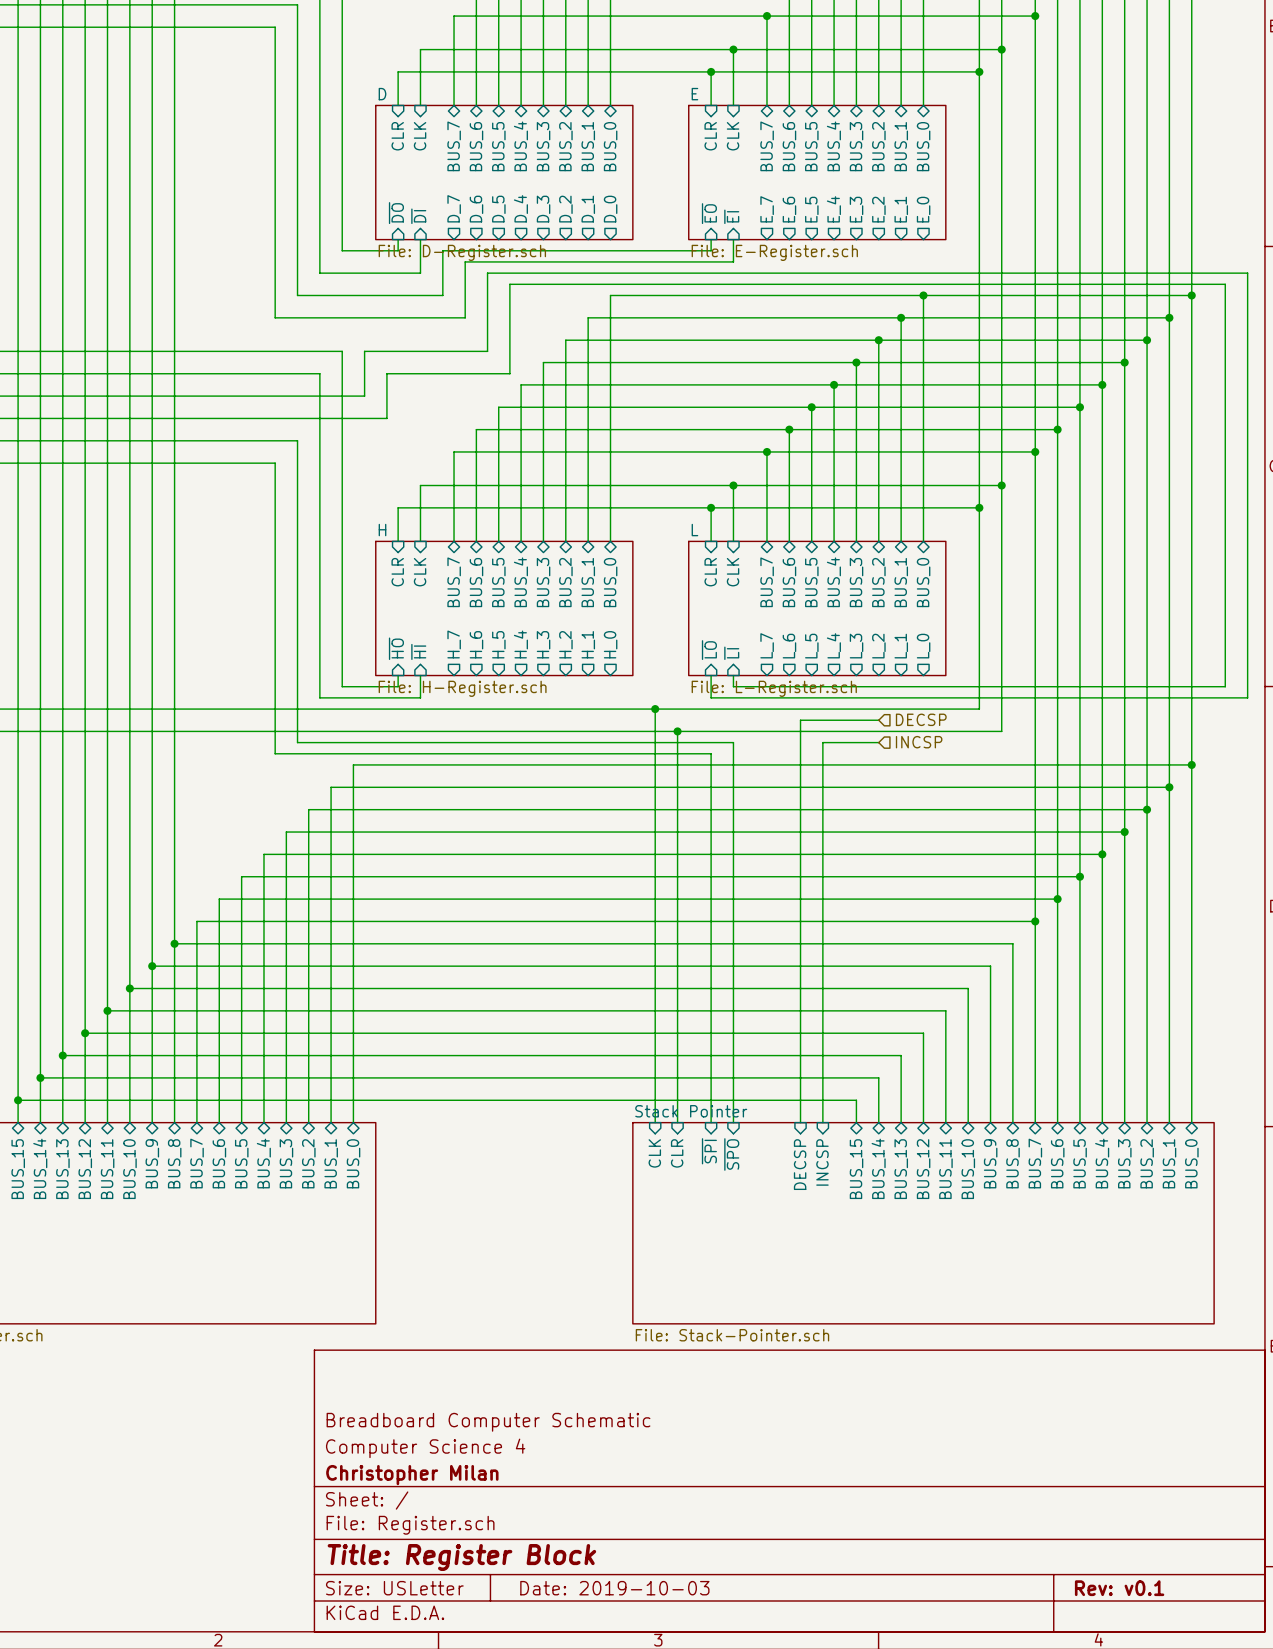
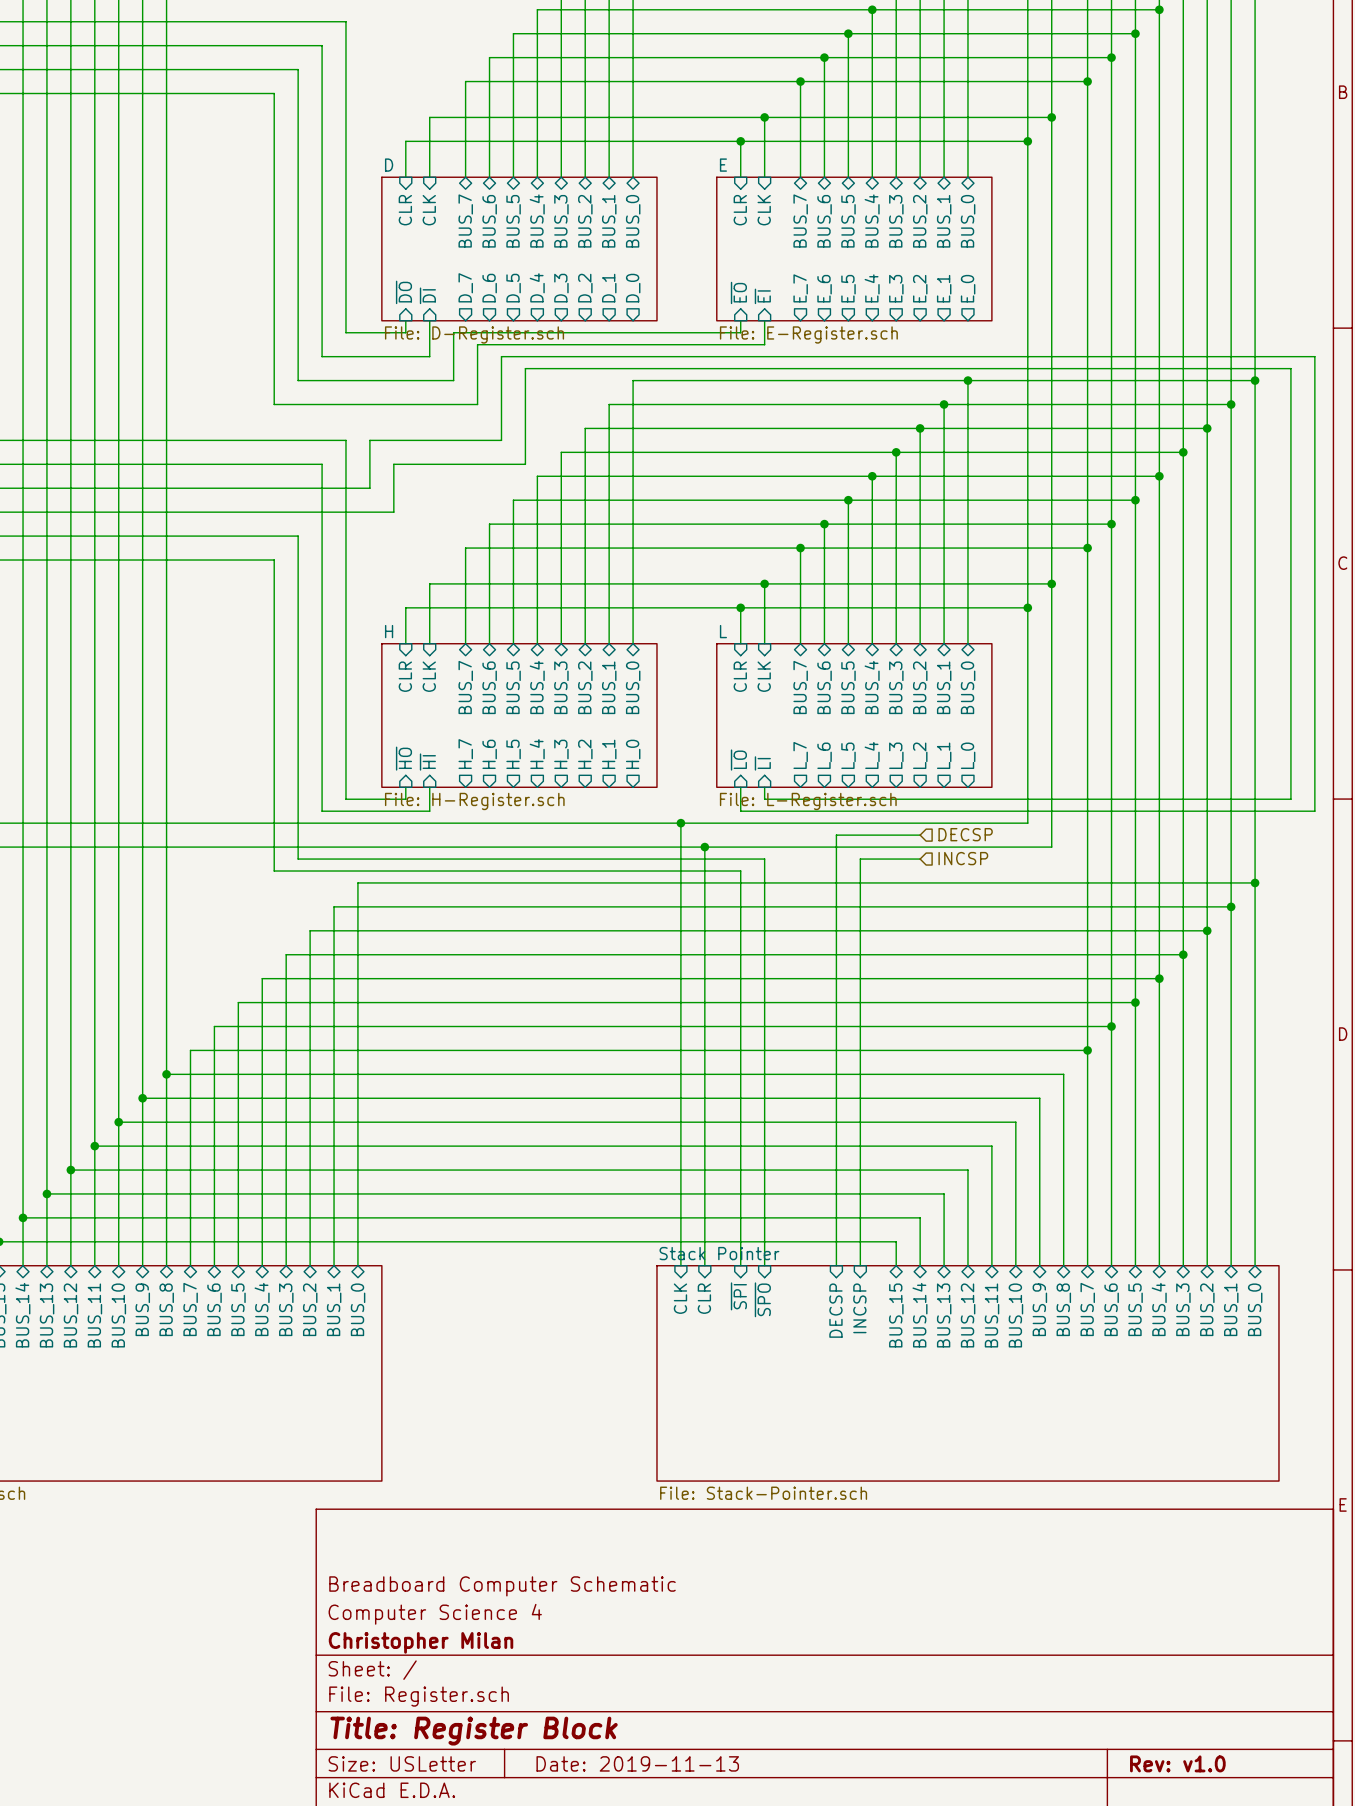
title block: Date: 2019-10-03 (614, 1588) -> Date: 2019-11-13 (637, 1763)
title block: Rev: v0.1 (1119, 1588) -> Rev: v1.0 (1177, 1763)

